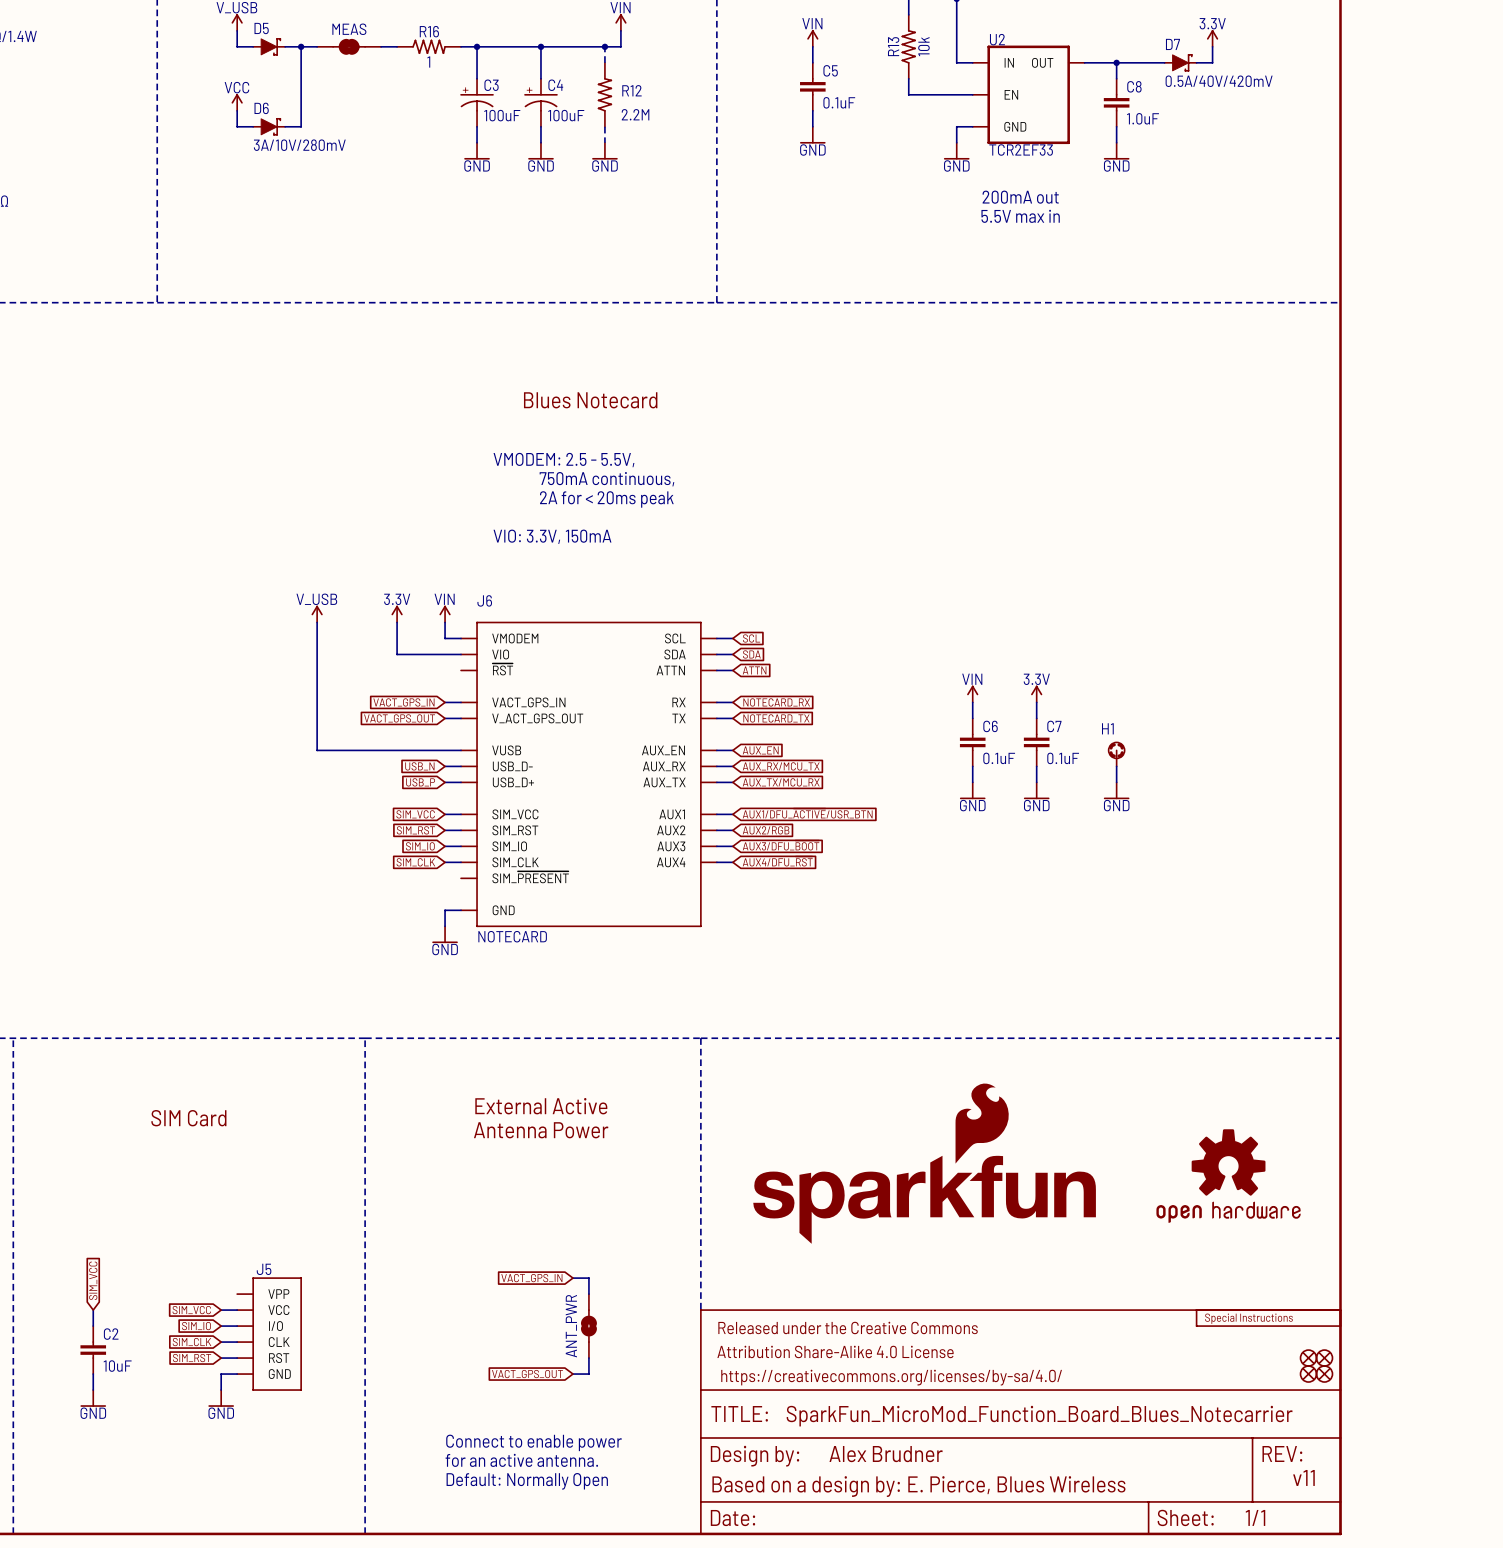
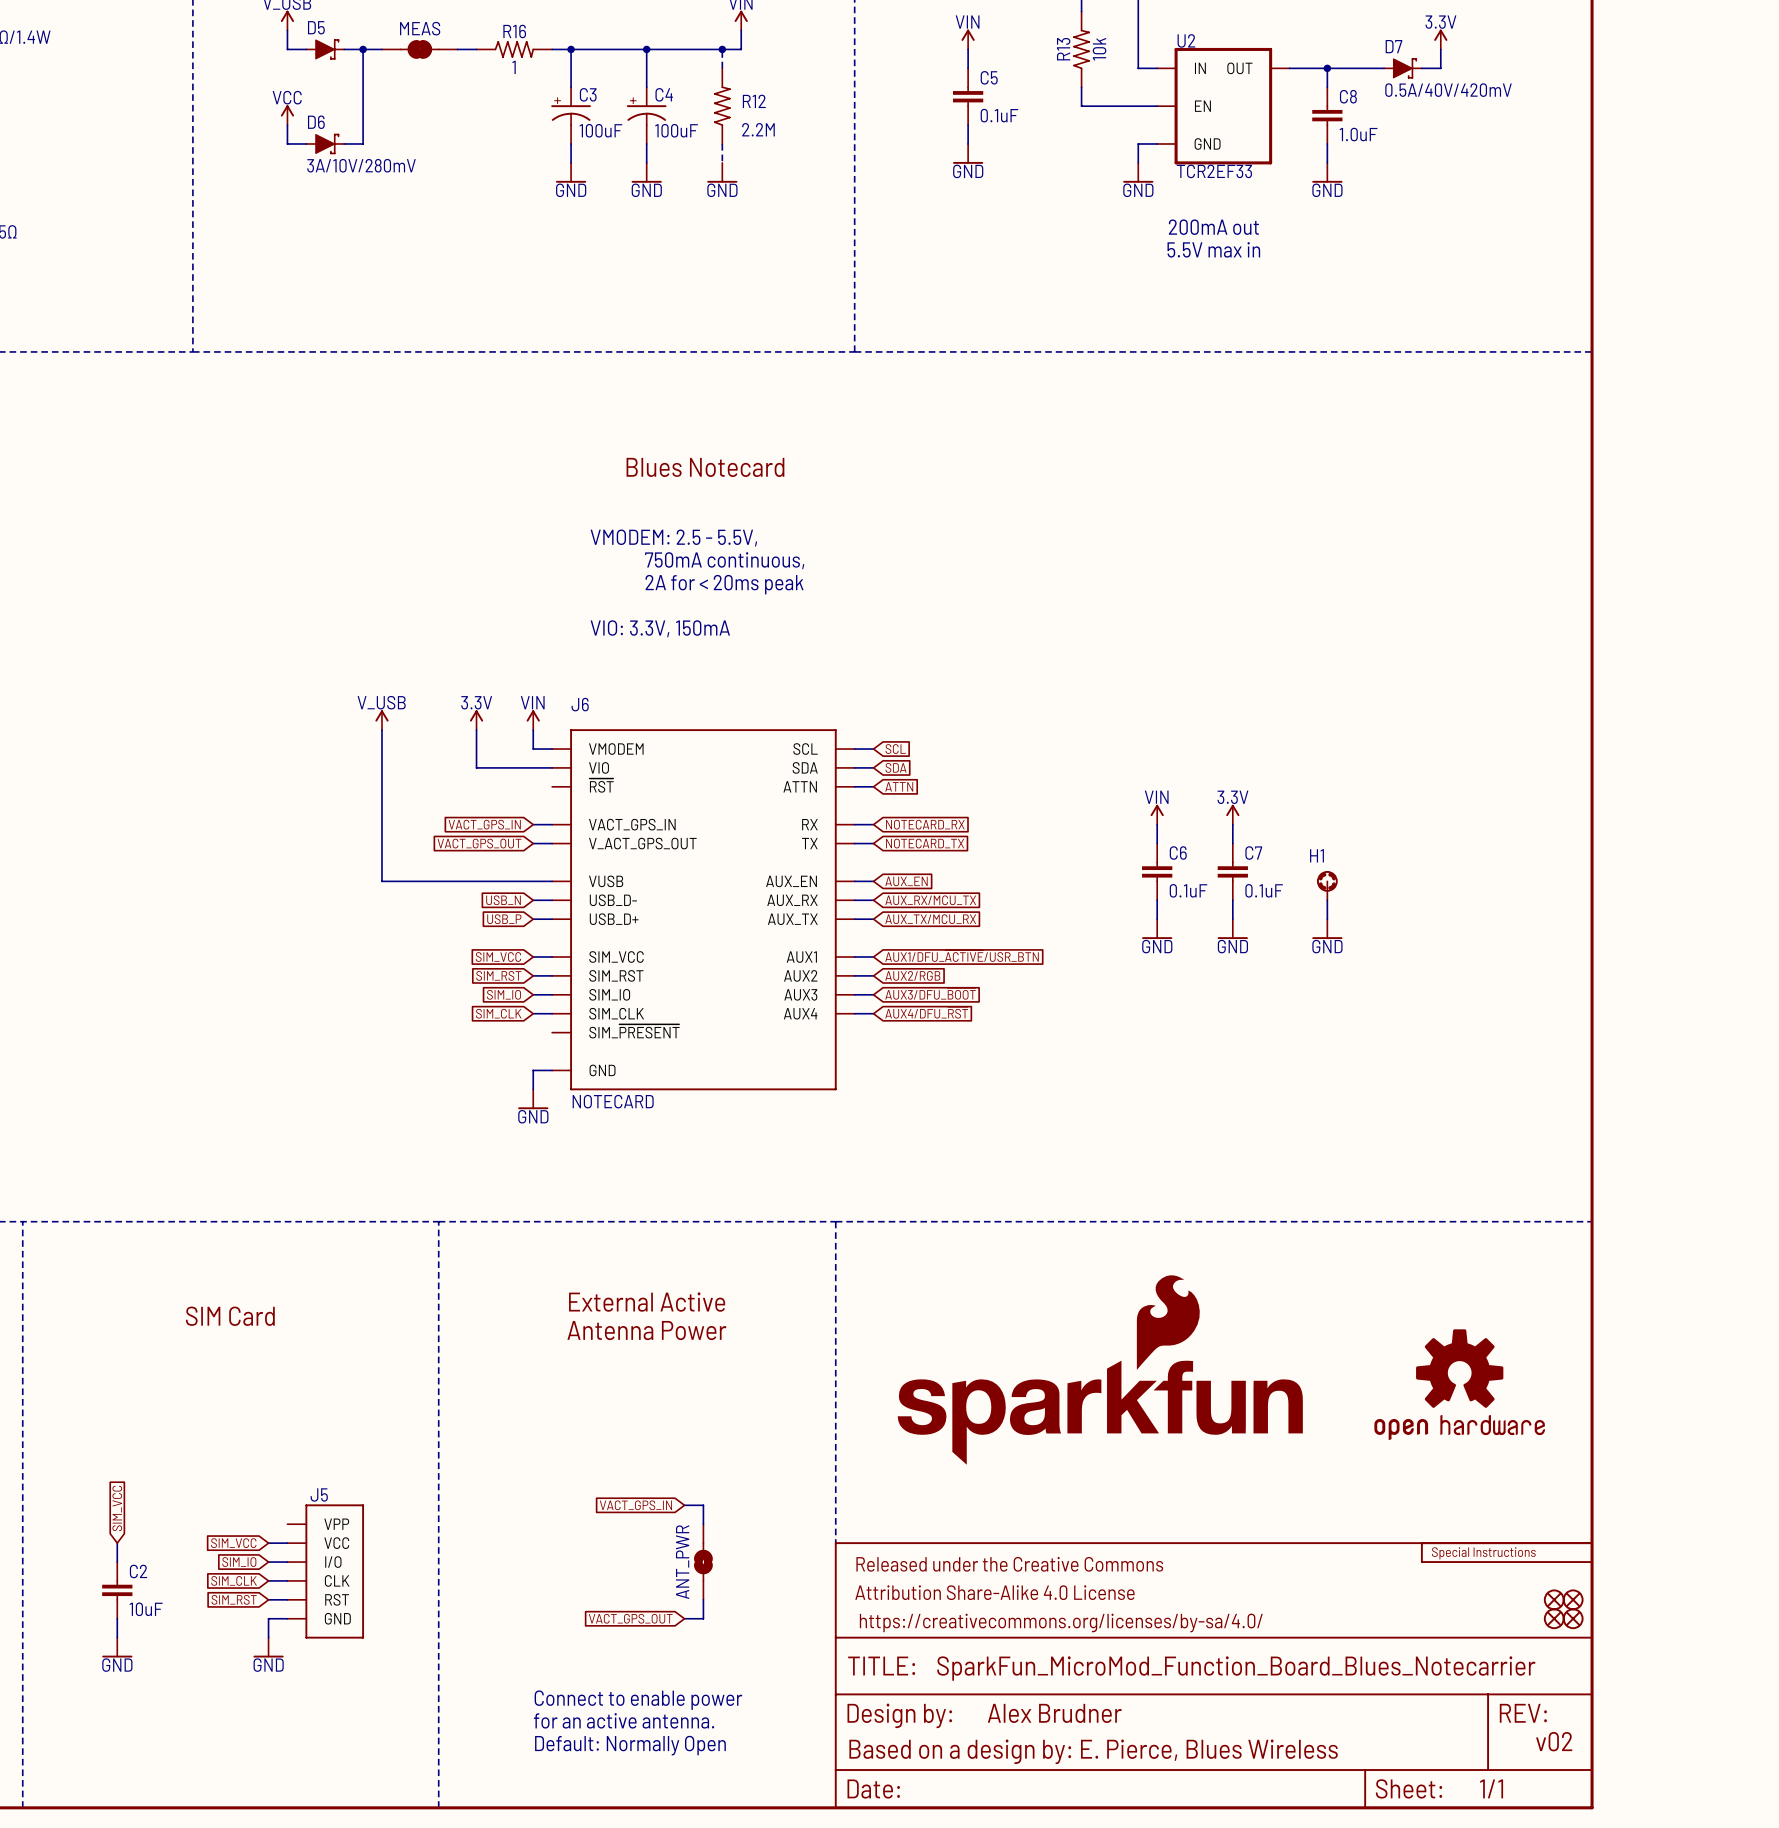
text: v11 (1303, 1477) -> v02 (1554, 1741)

